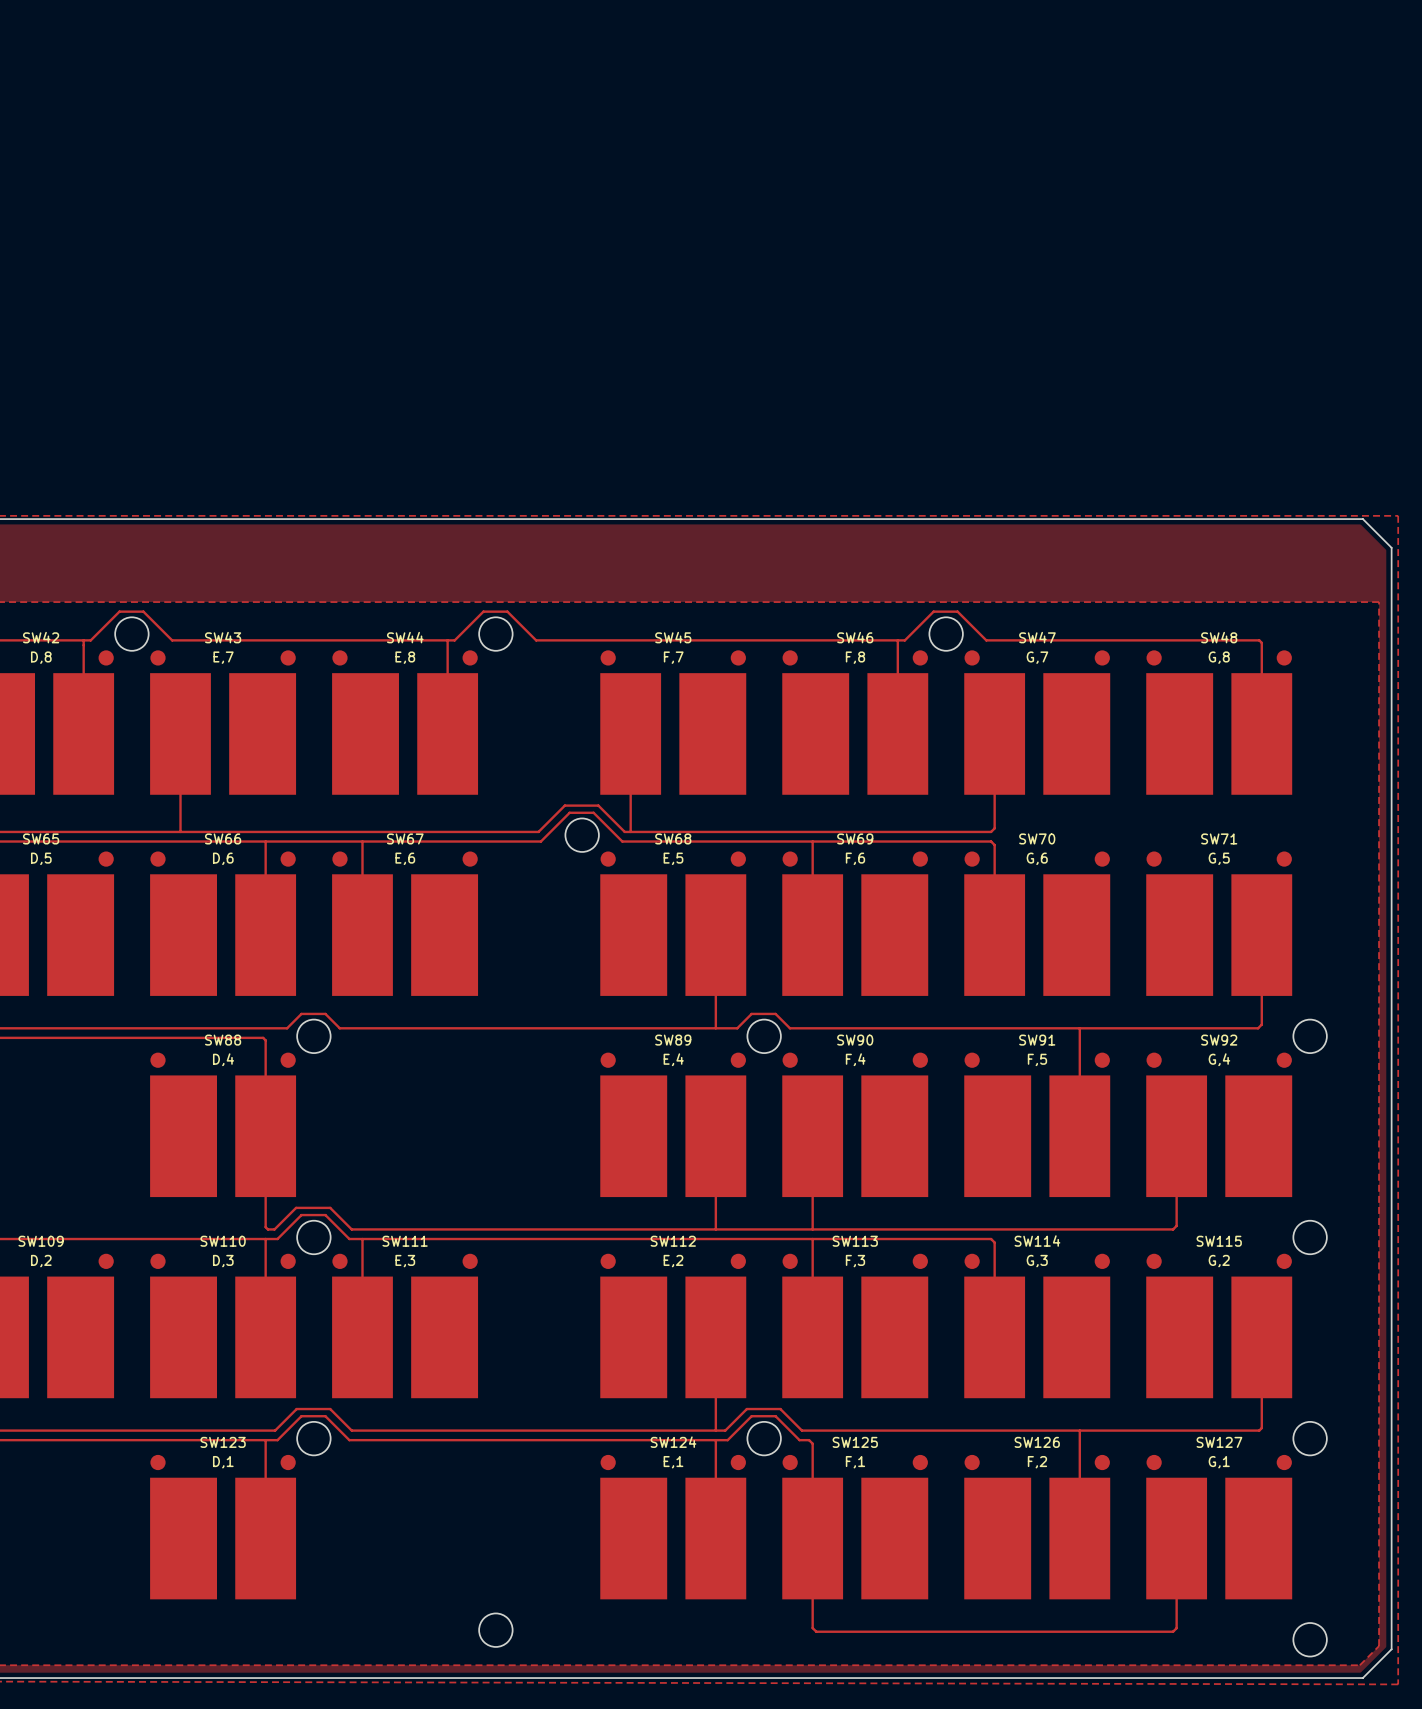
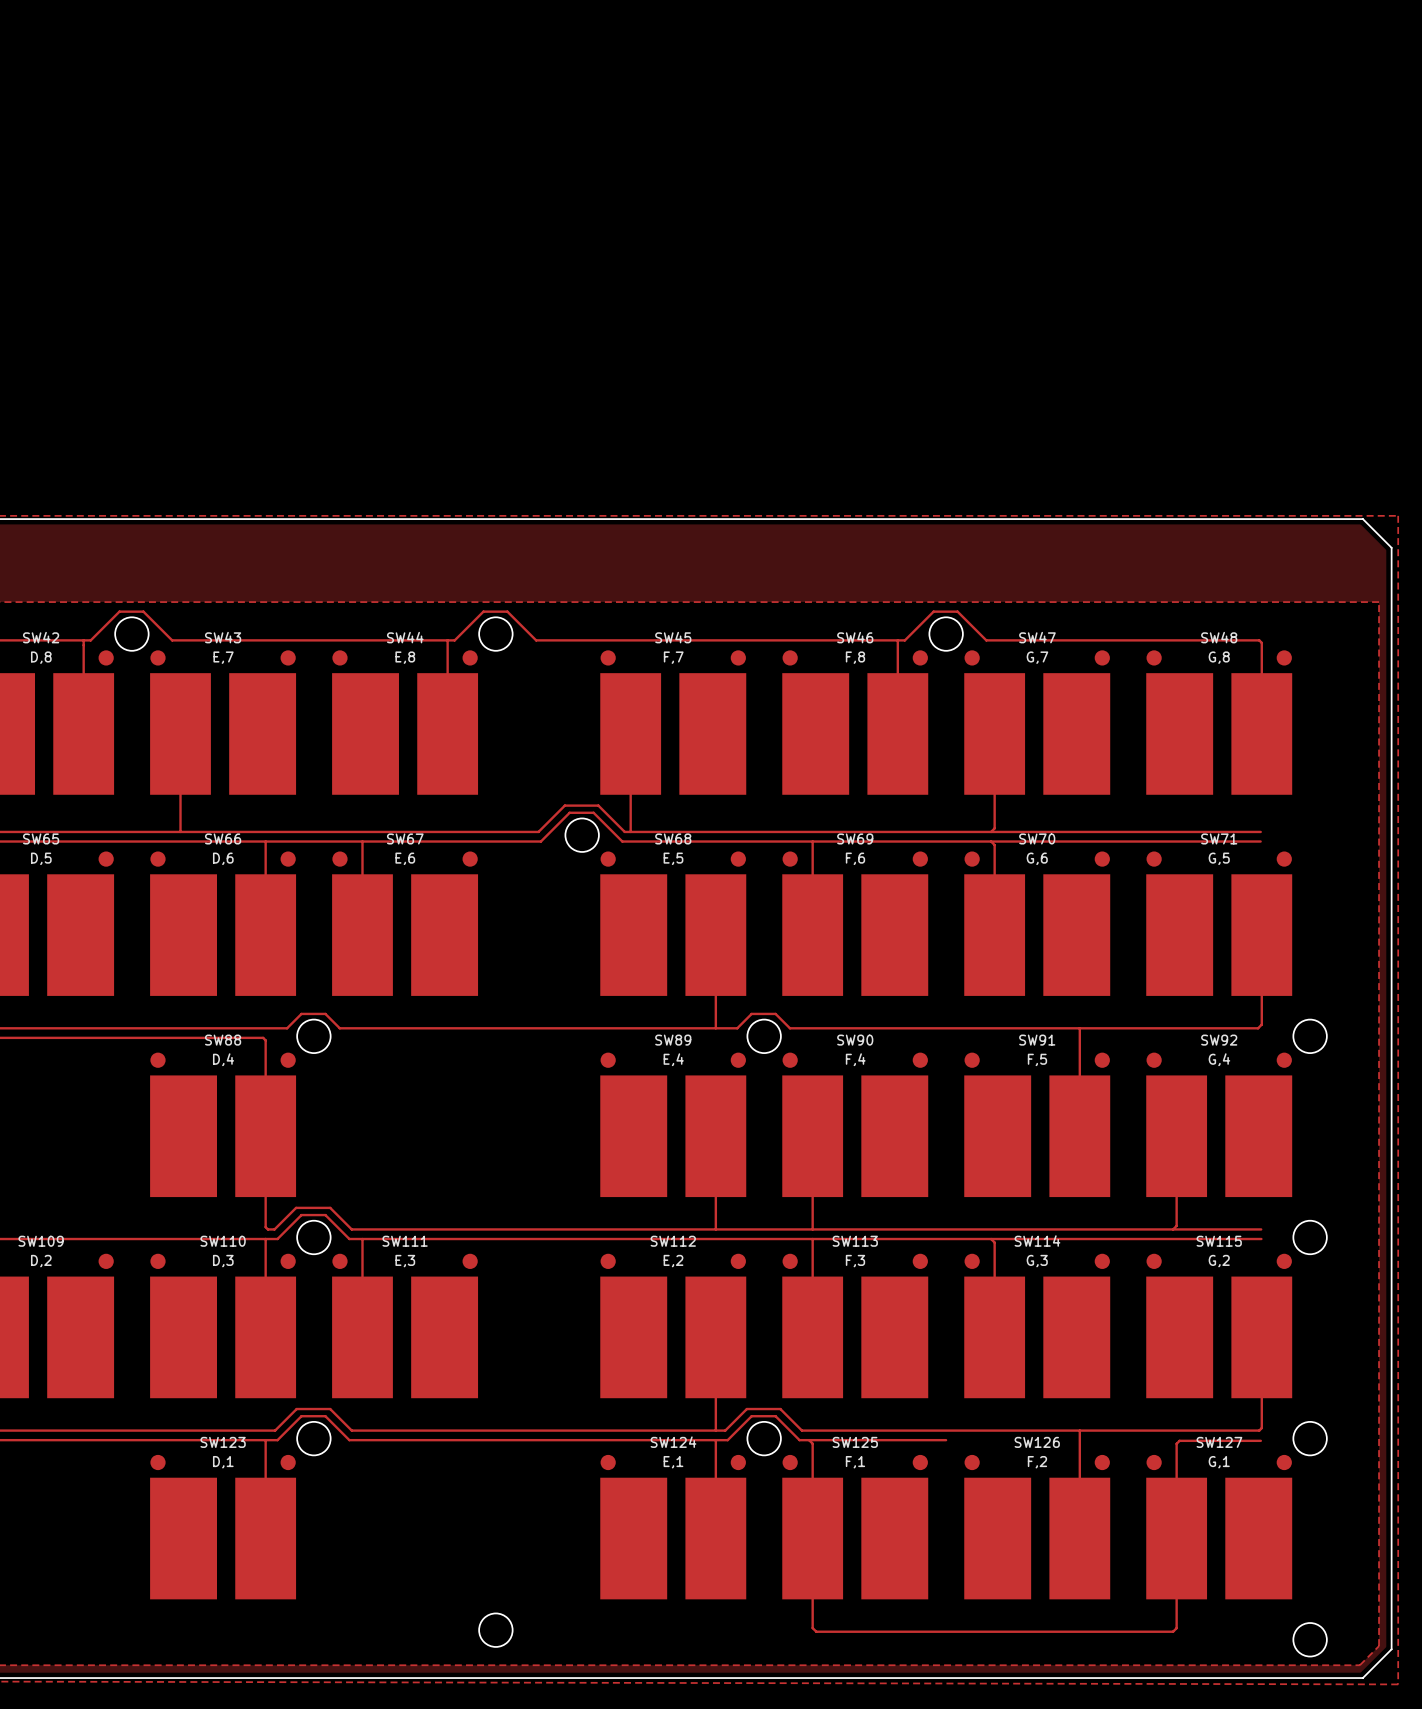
track: none -> (991, 831) (1260, 831)
track: none -> (991, 841) (1260, 841)
track: none -> (1173, 1229) (1261, 1229)
track: none -> (991, 1239) (1261, 1239)
track: none -> (809, 1440) (946, 1440)
track: none -> (1260, 1440) (1179, 1440) (1176, 1443) (1176, 1538)

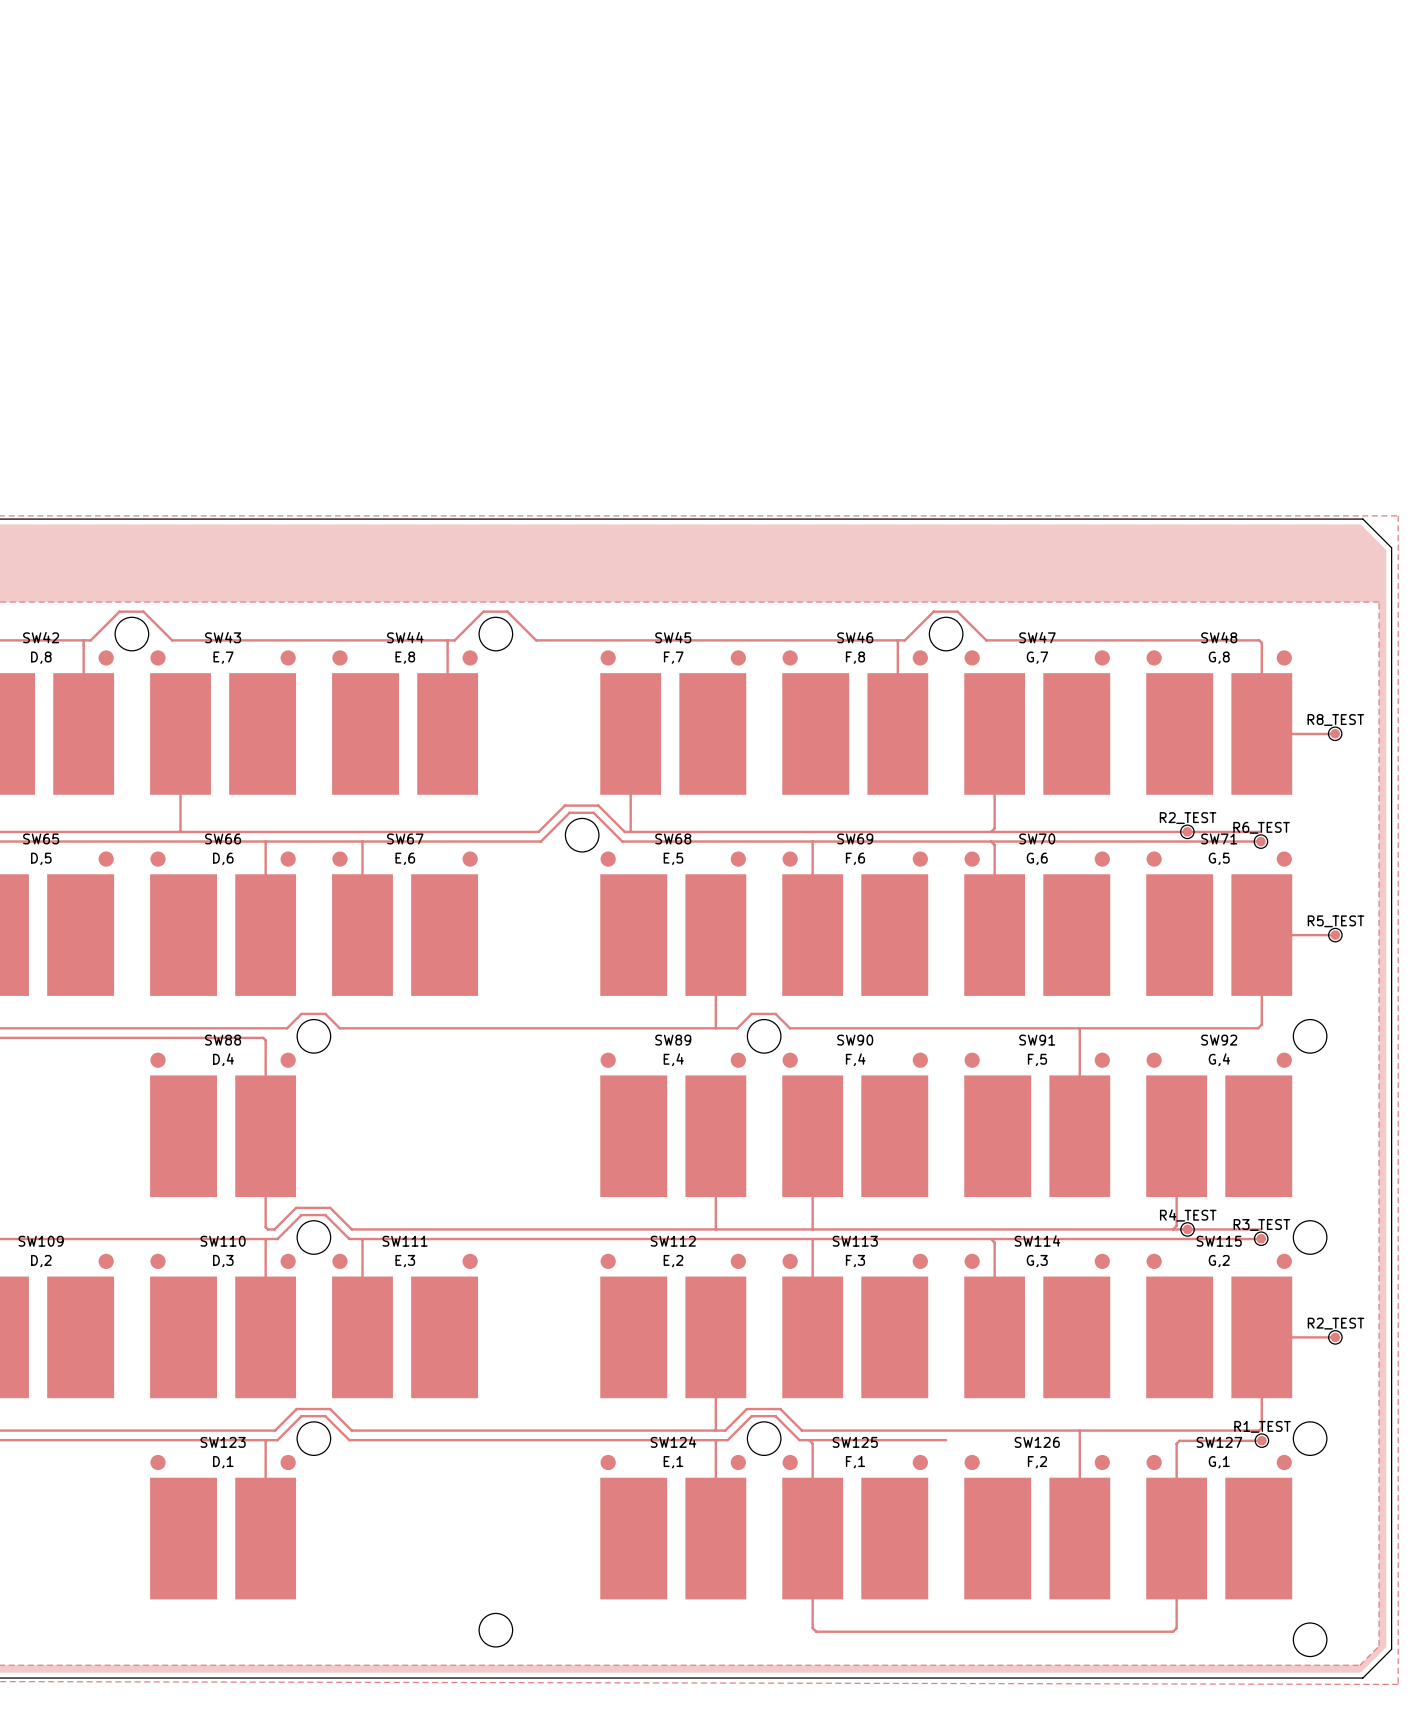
track: none -> (1335, 733) (1261, 733)
R8_TEST: none -> (1335, 733)
R2_TEST: none -> (1187, 831)
R6_TEST: none -> (1260, 841)
track: none -> (1261, 935) (1335, 935)
R5_TEST: none -> (1335, 935)
R4_TEST: none -> (1187, 1229)
R3_TEST: none -> (1261, 1238)
track: none -> (1261, 1337) (1335, 1337)
R2_TEST: none -> (1335, 1337)
R1_TEST: none -> (1261, 1440)

